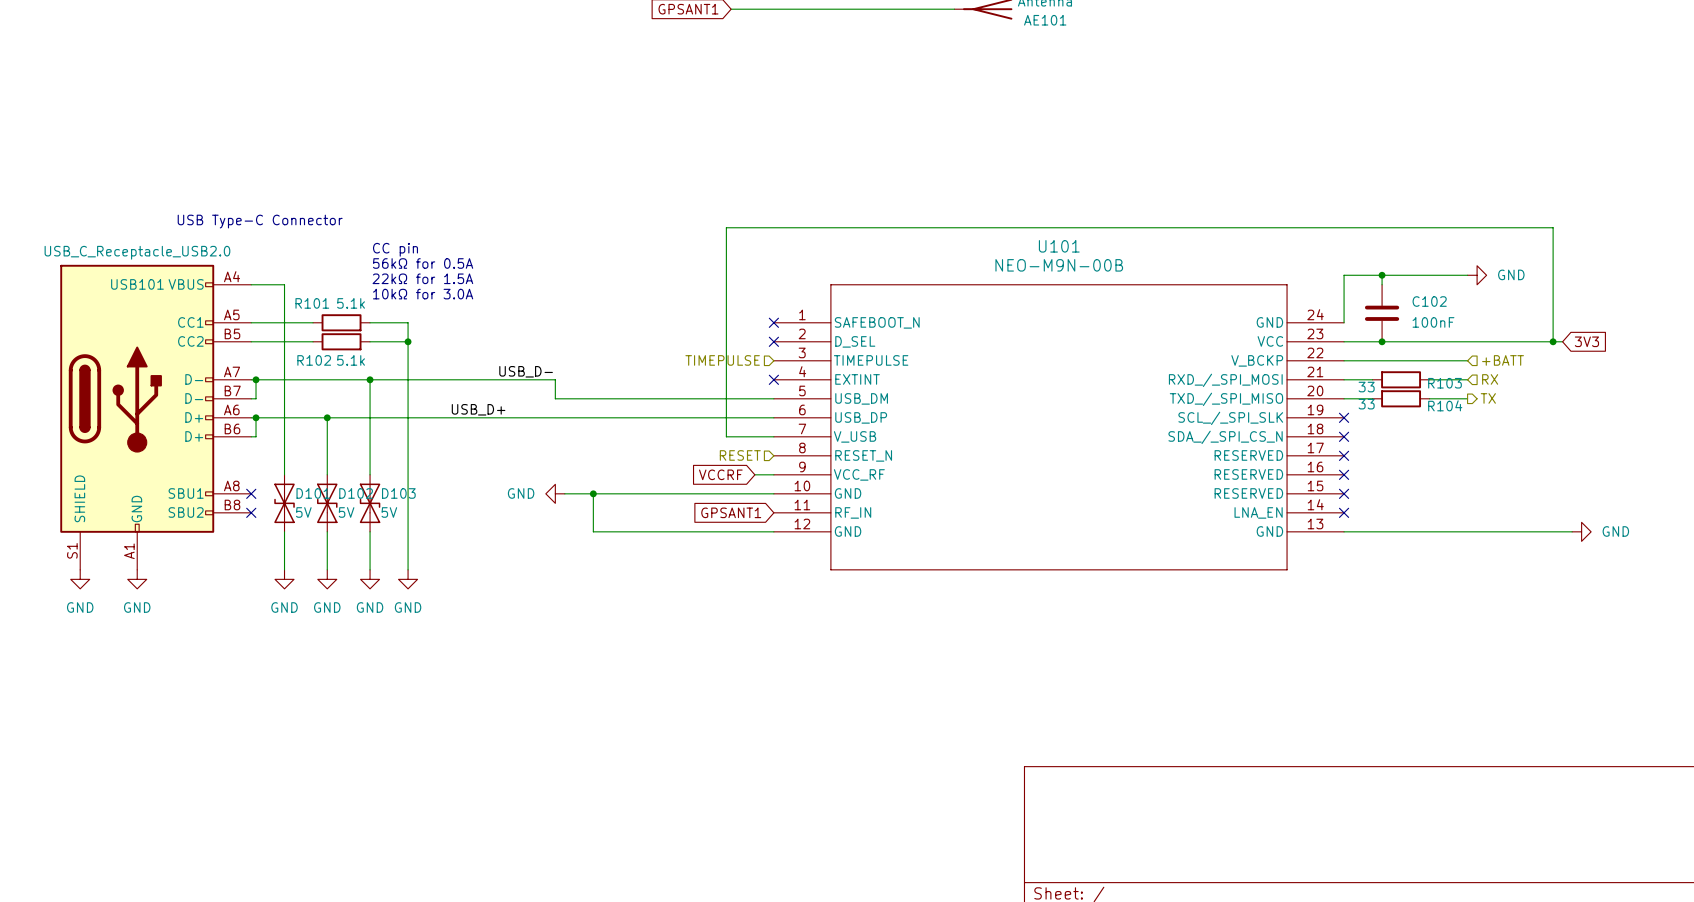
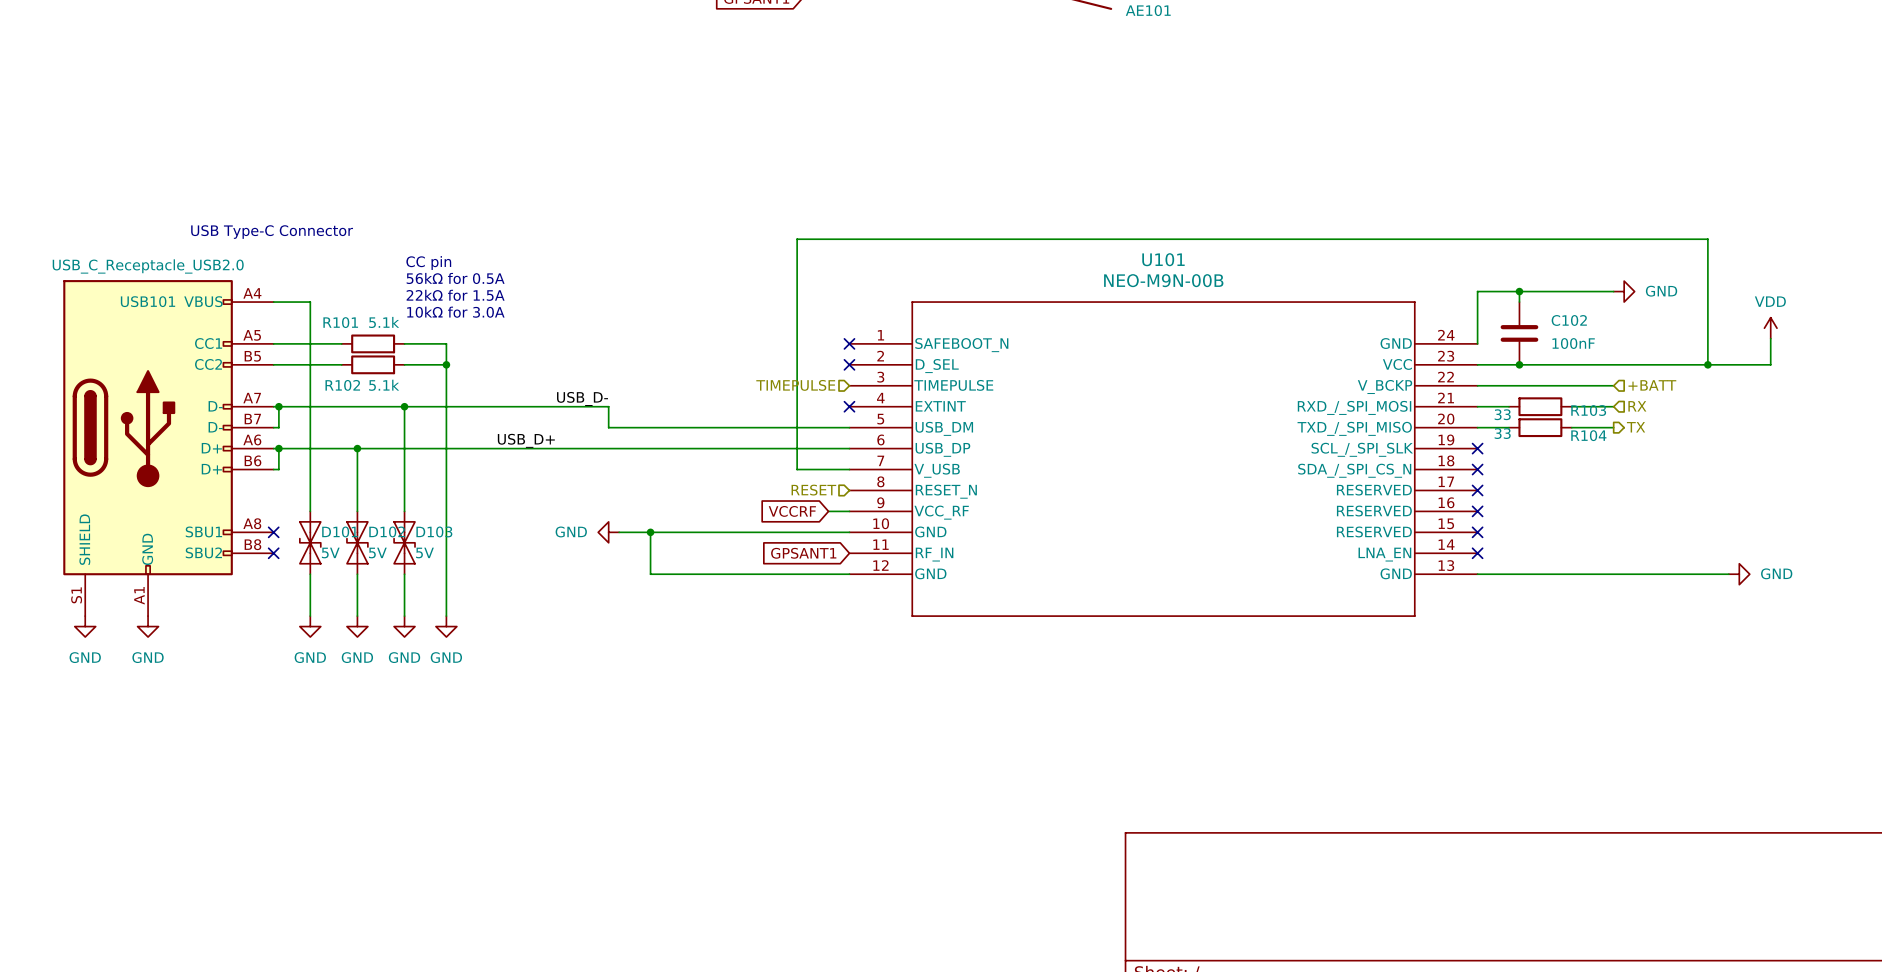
power symbol: none -> VDD (1770, 328)
wire: none -> (1770, 338) (1770, 364) (1718, 364)
global label: 3V3 (1586, 341) -> none

